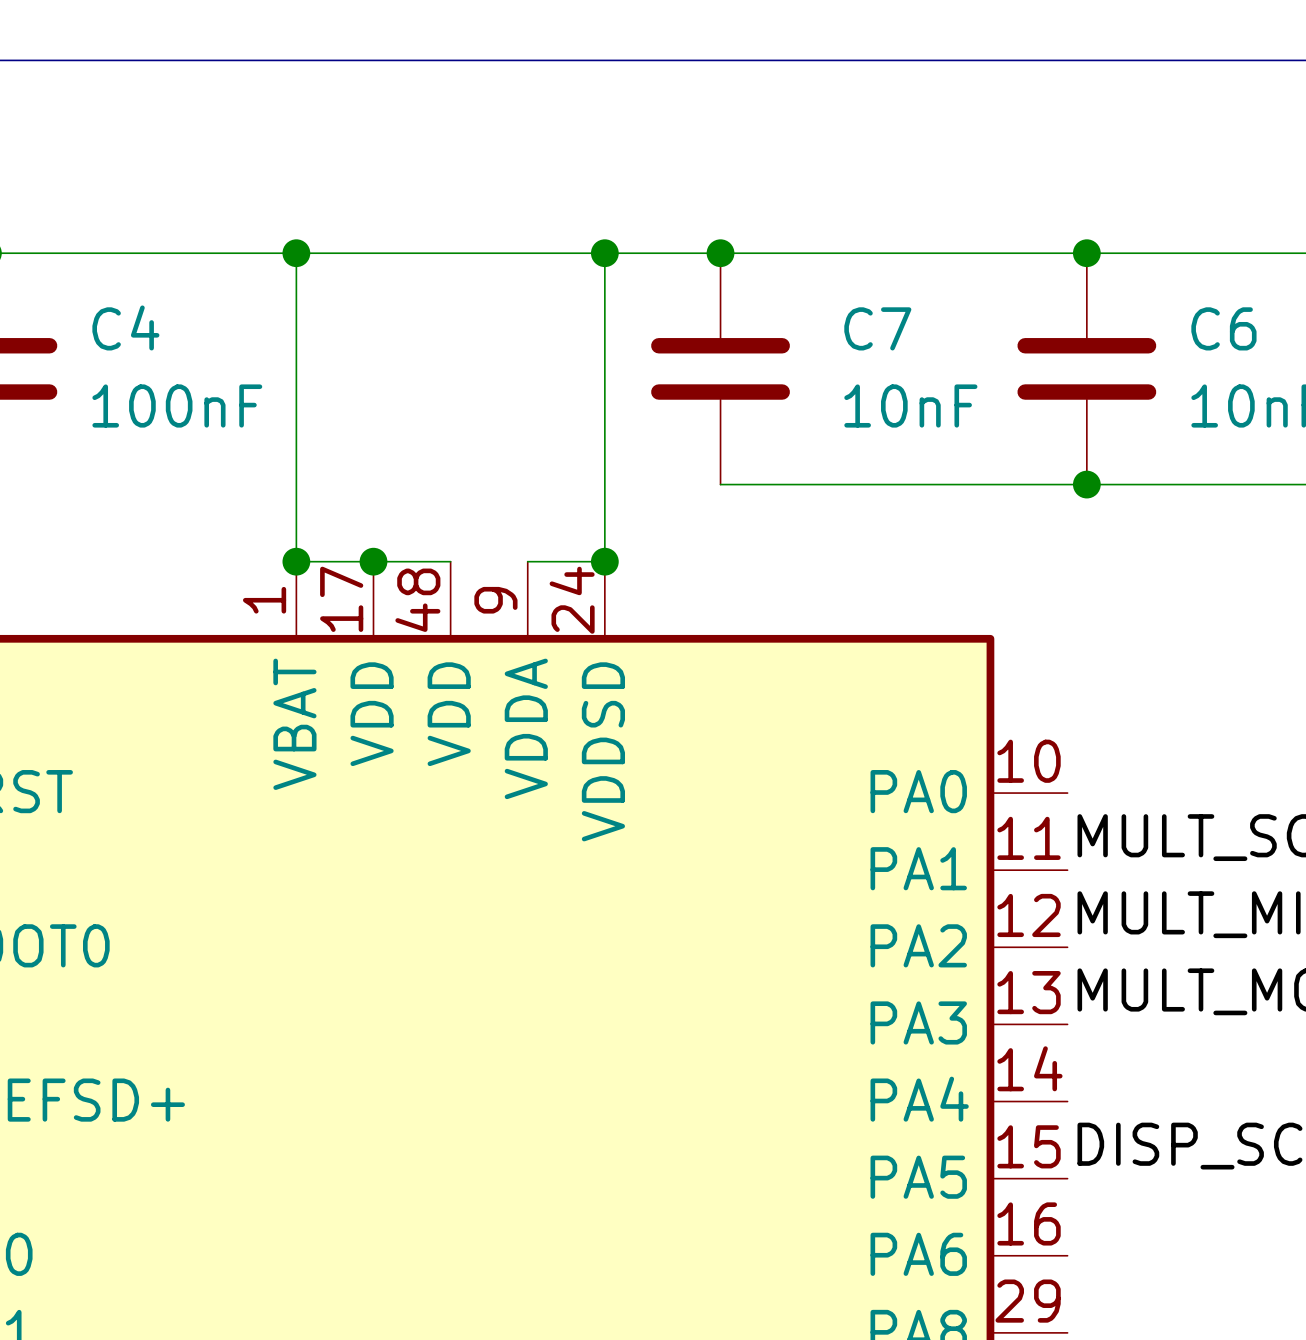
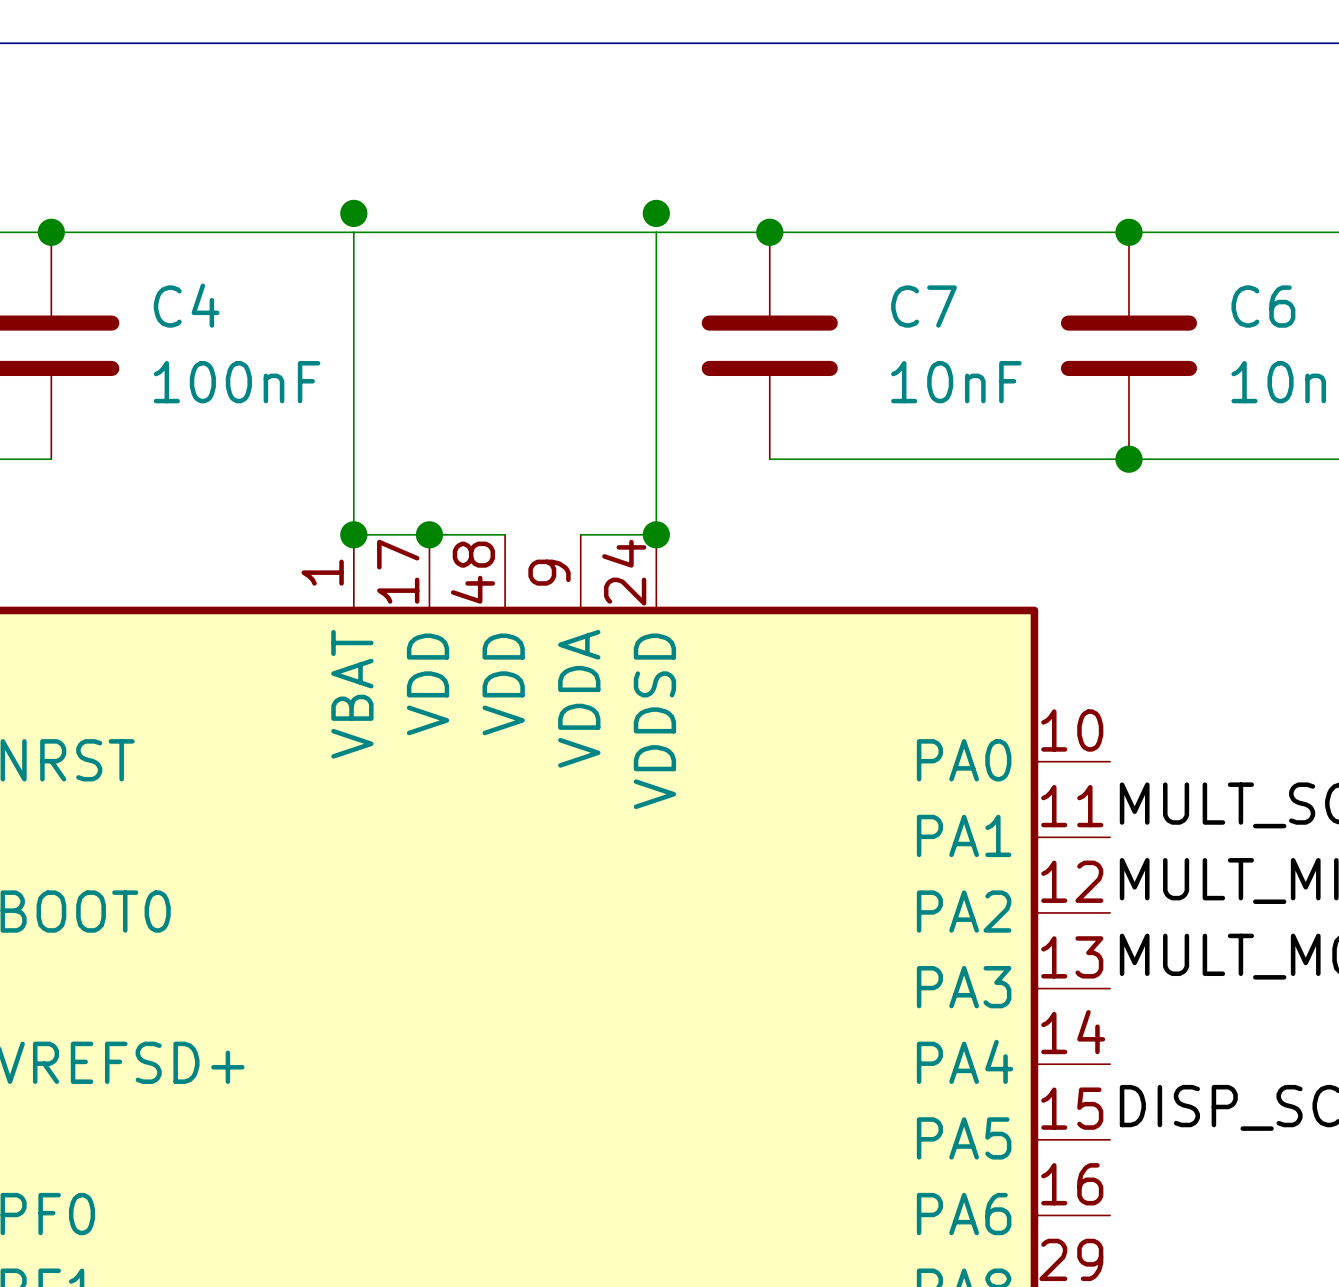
junction position: (296, 253) -> (353, 213)
junction position: (604, 253) -> (656, 213)

